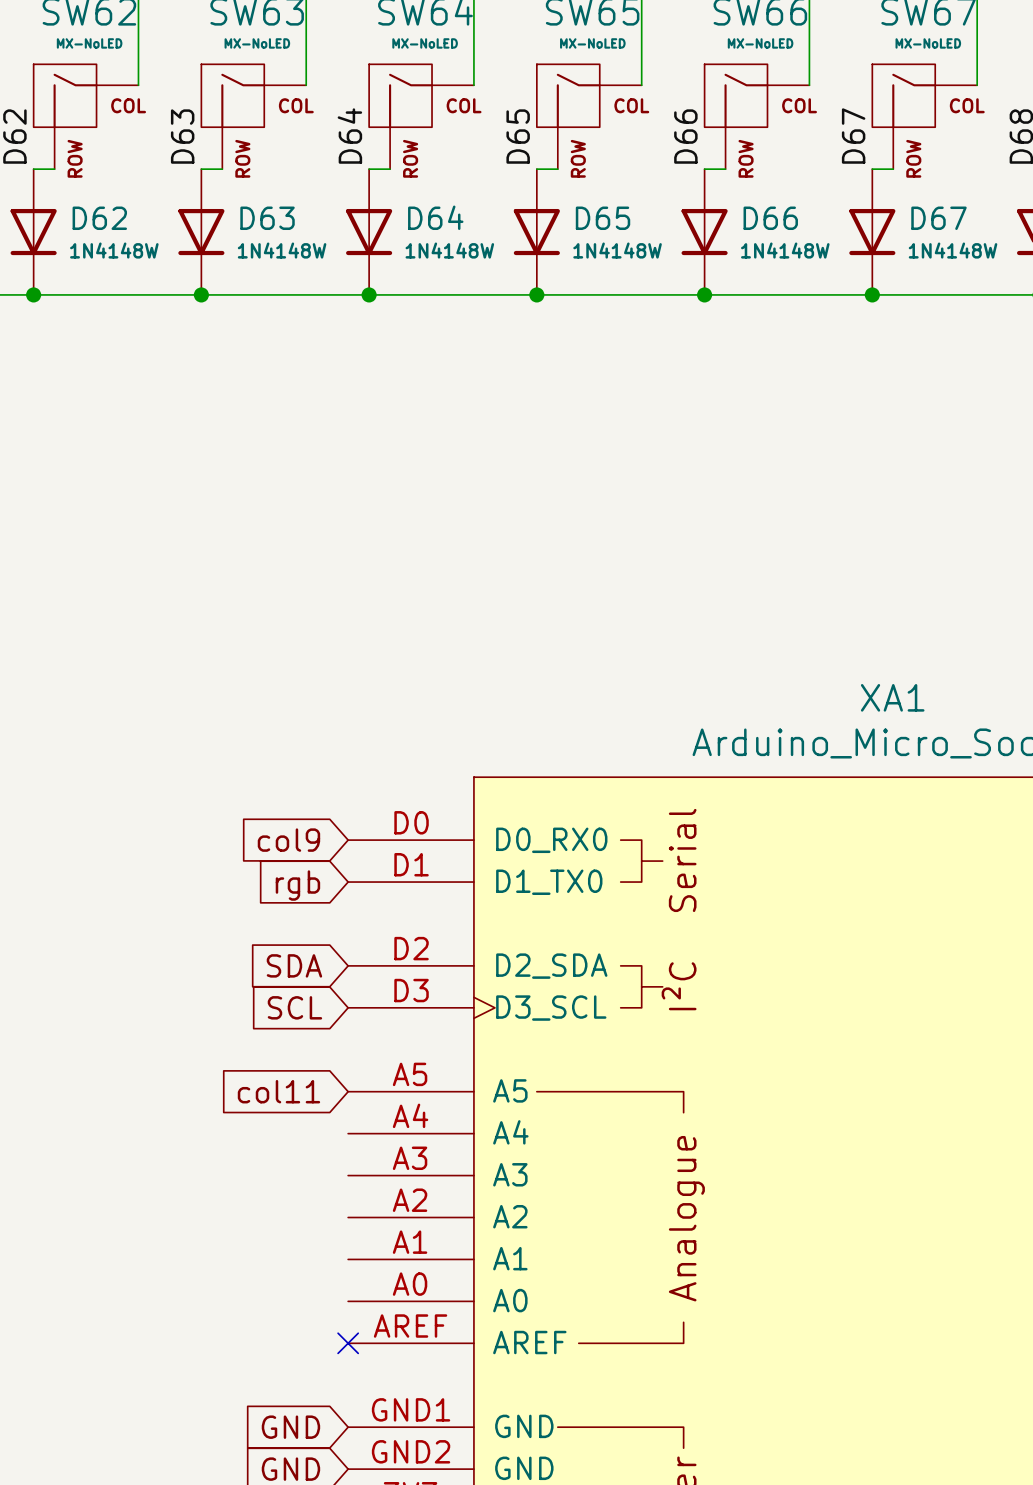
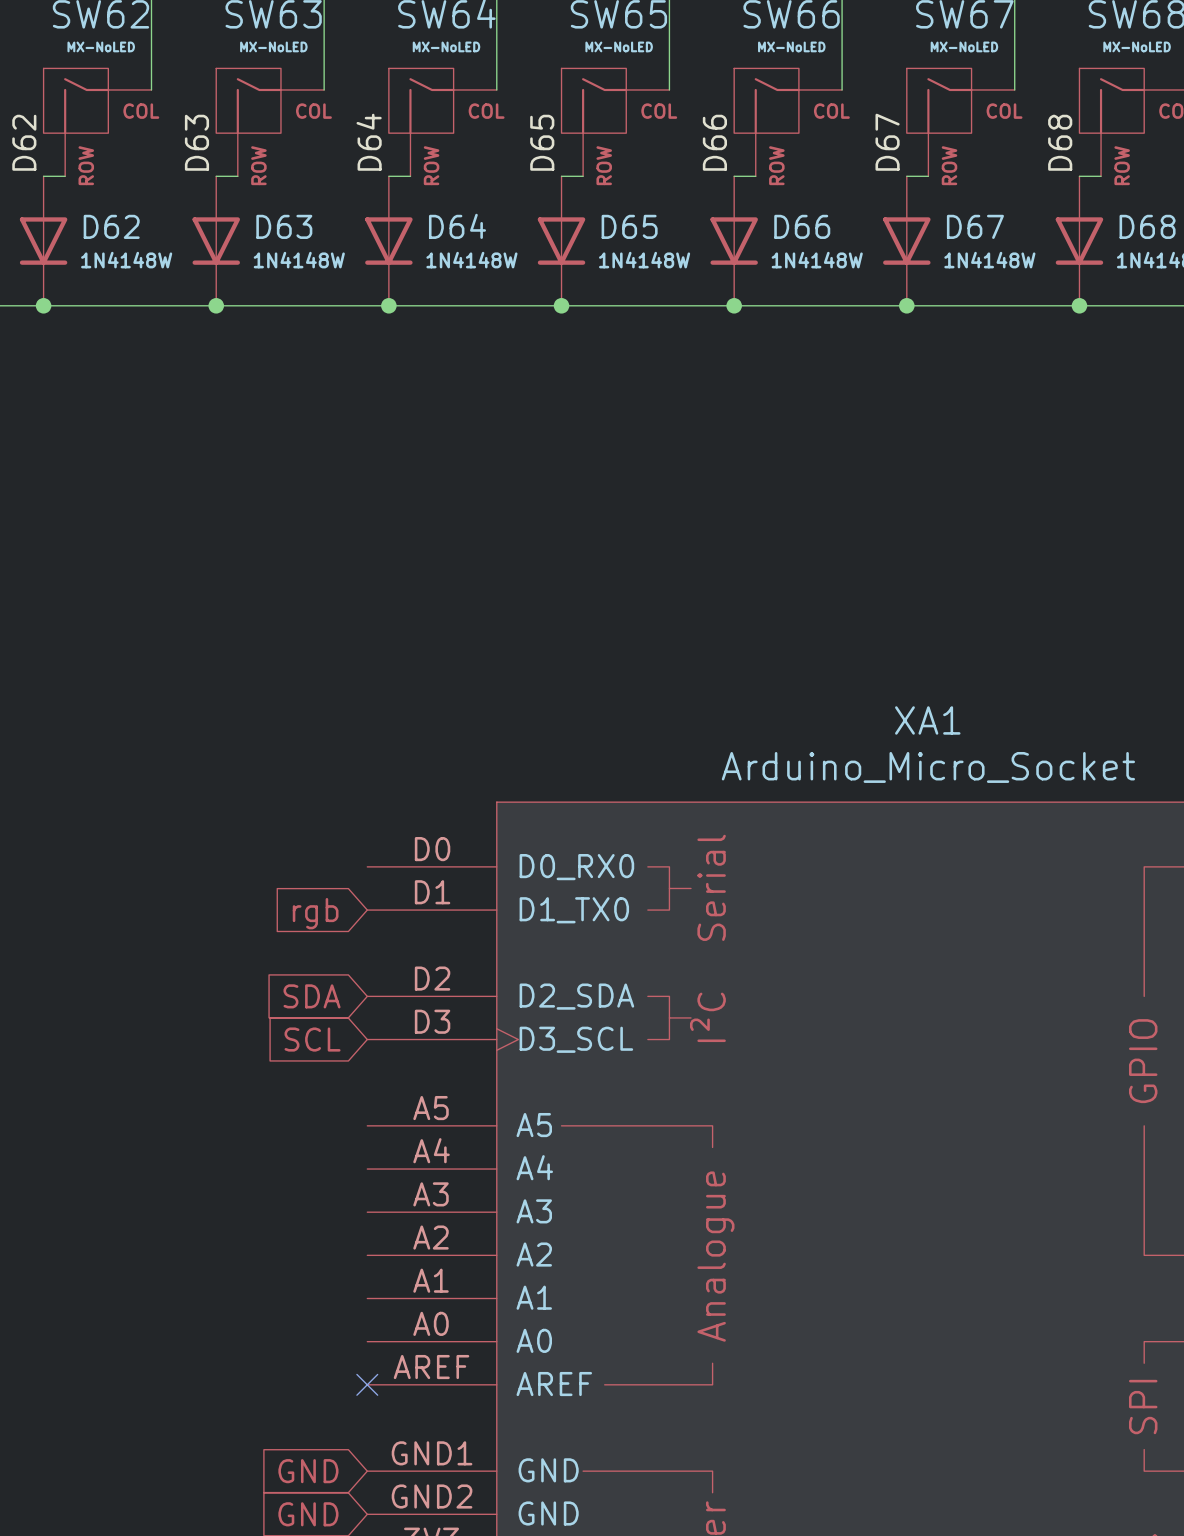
global label: col9 (288, 840) -> none
global label: col11 (278, 1091) -> none

